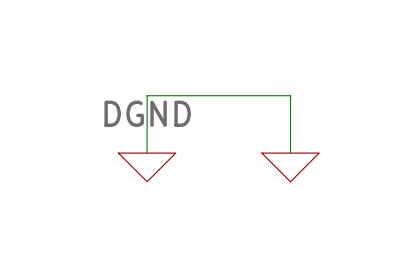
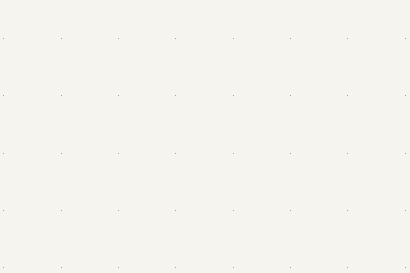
wire: (147, 153) (147, 95) (290, 95) (290, 153) -> none
power symbol: DGND (147, 167) -> none
power symbol: (290, 167) -> none

